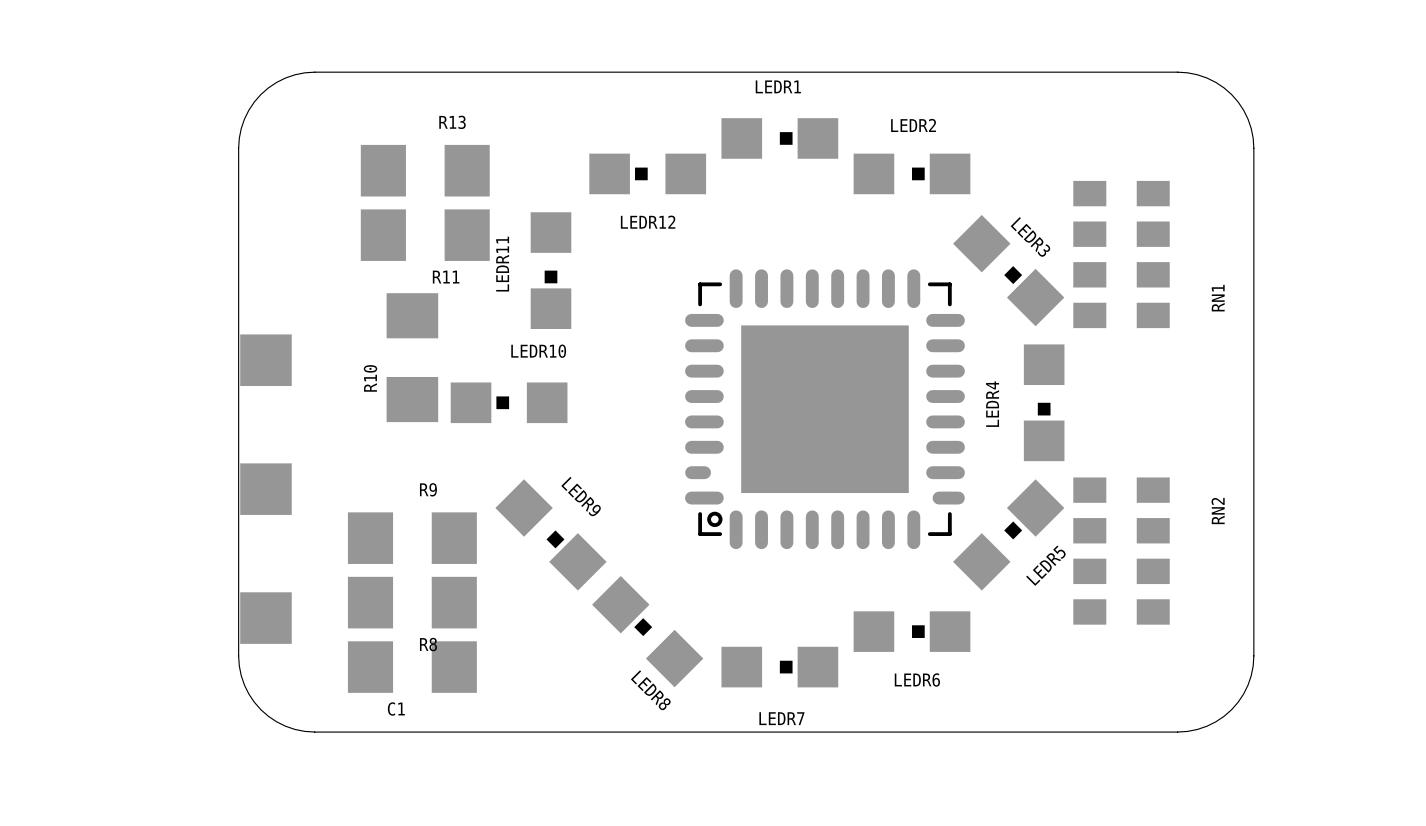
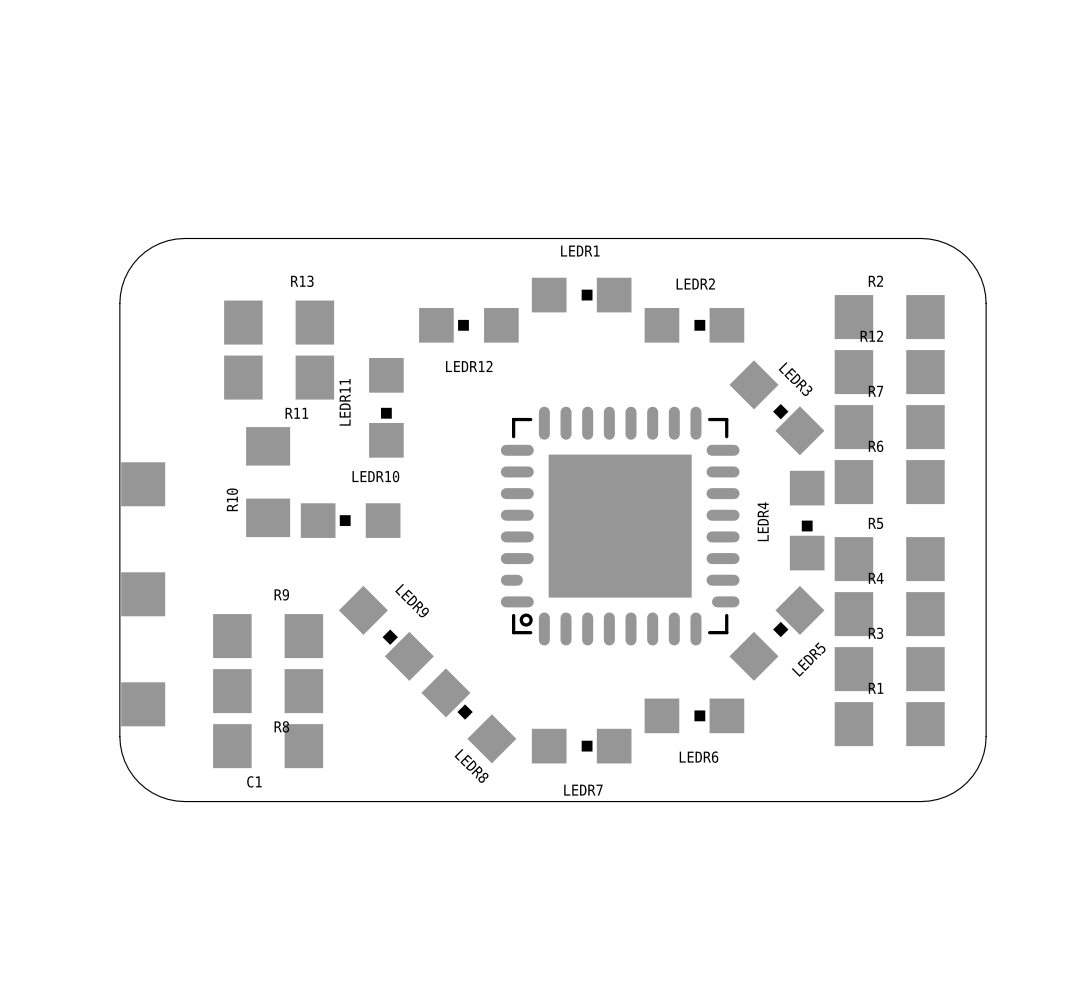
R2: none -> (889, 317)
R12: none -> (889, 372)
RN1: (1121, 254) -> none
R7: none -> (889, 427)
R6: none -> (889, 482)
R5: none -> (889, 559)
R4: none -> (889, 614)
RN2: (1121, 551) -> none
R3: none -> (889, 669)
R1: none -> (889, 724)

